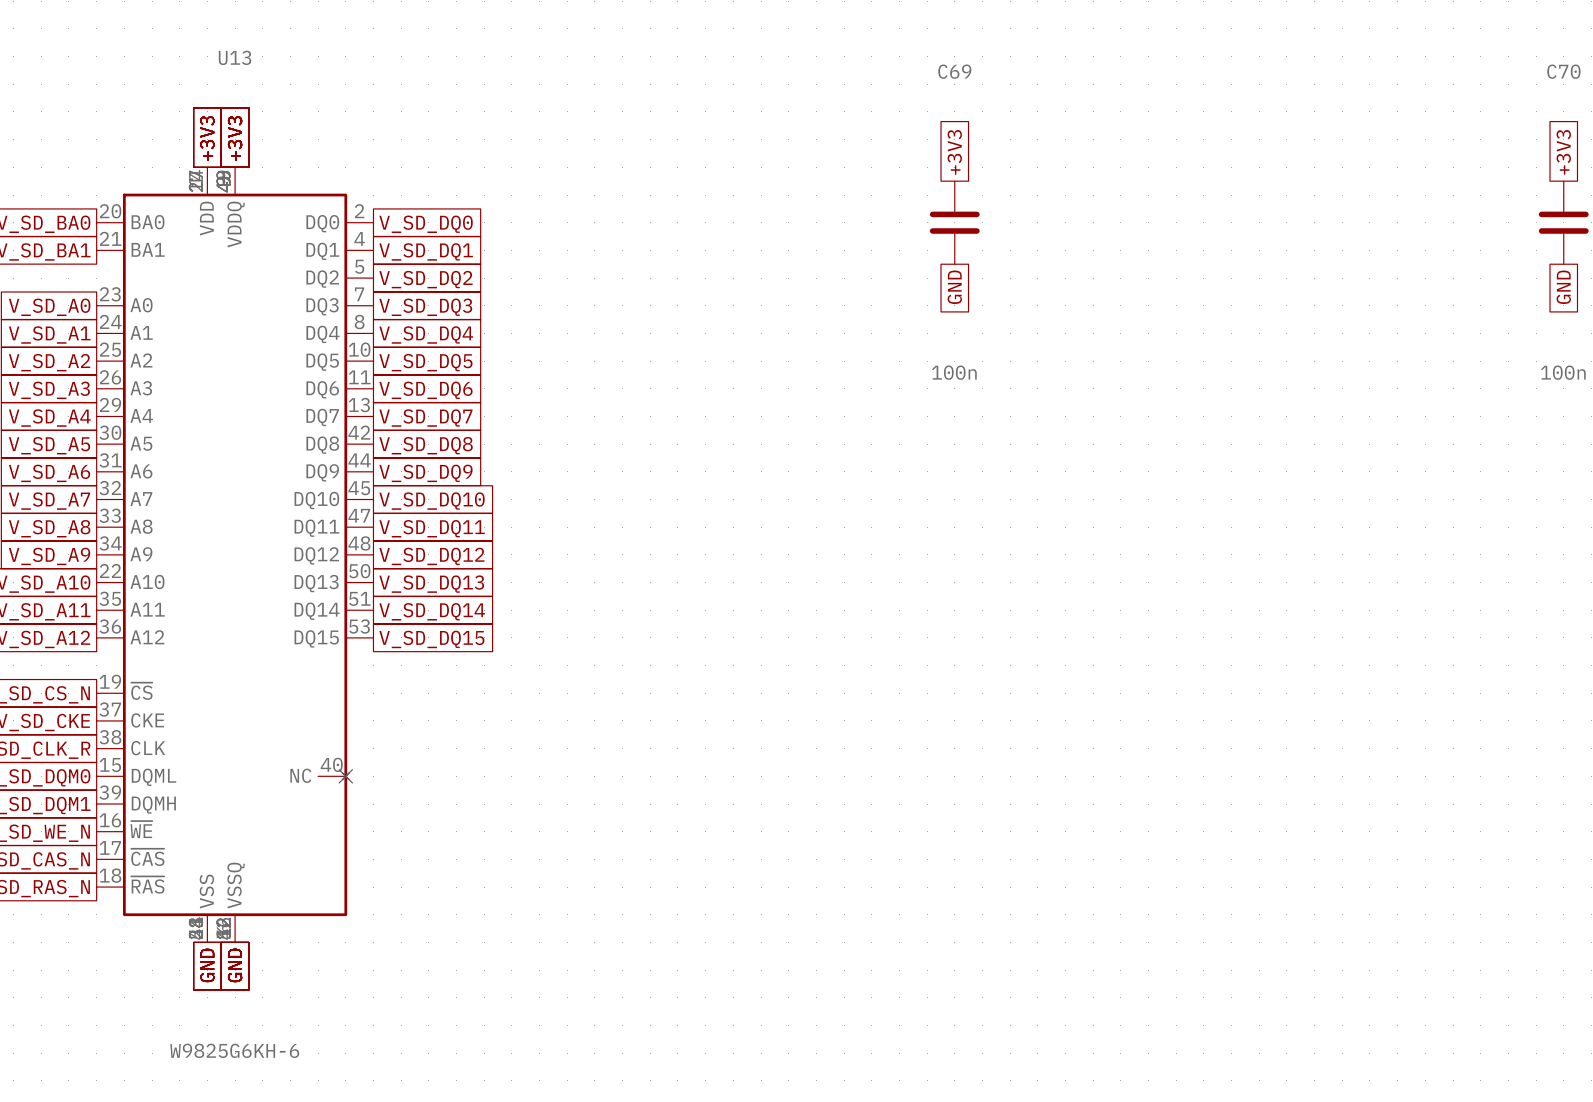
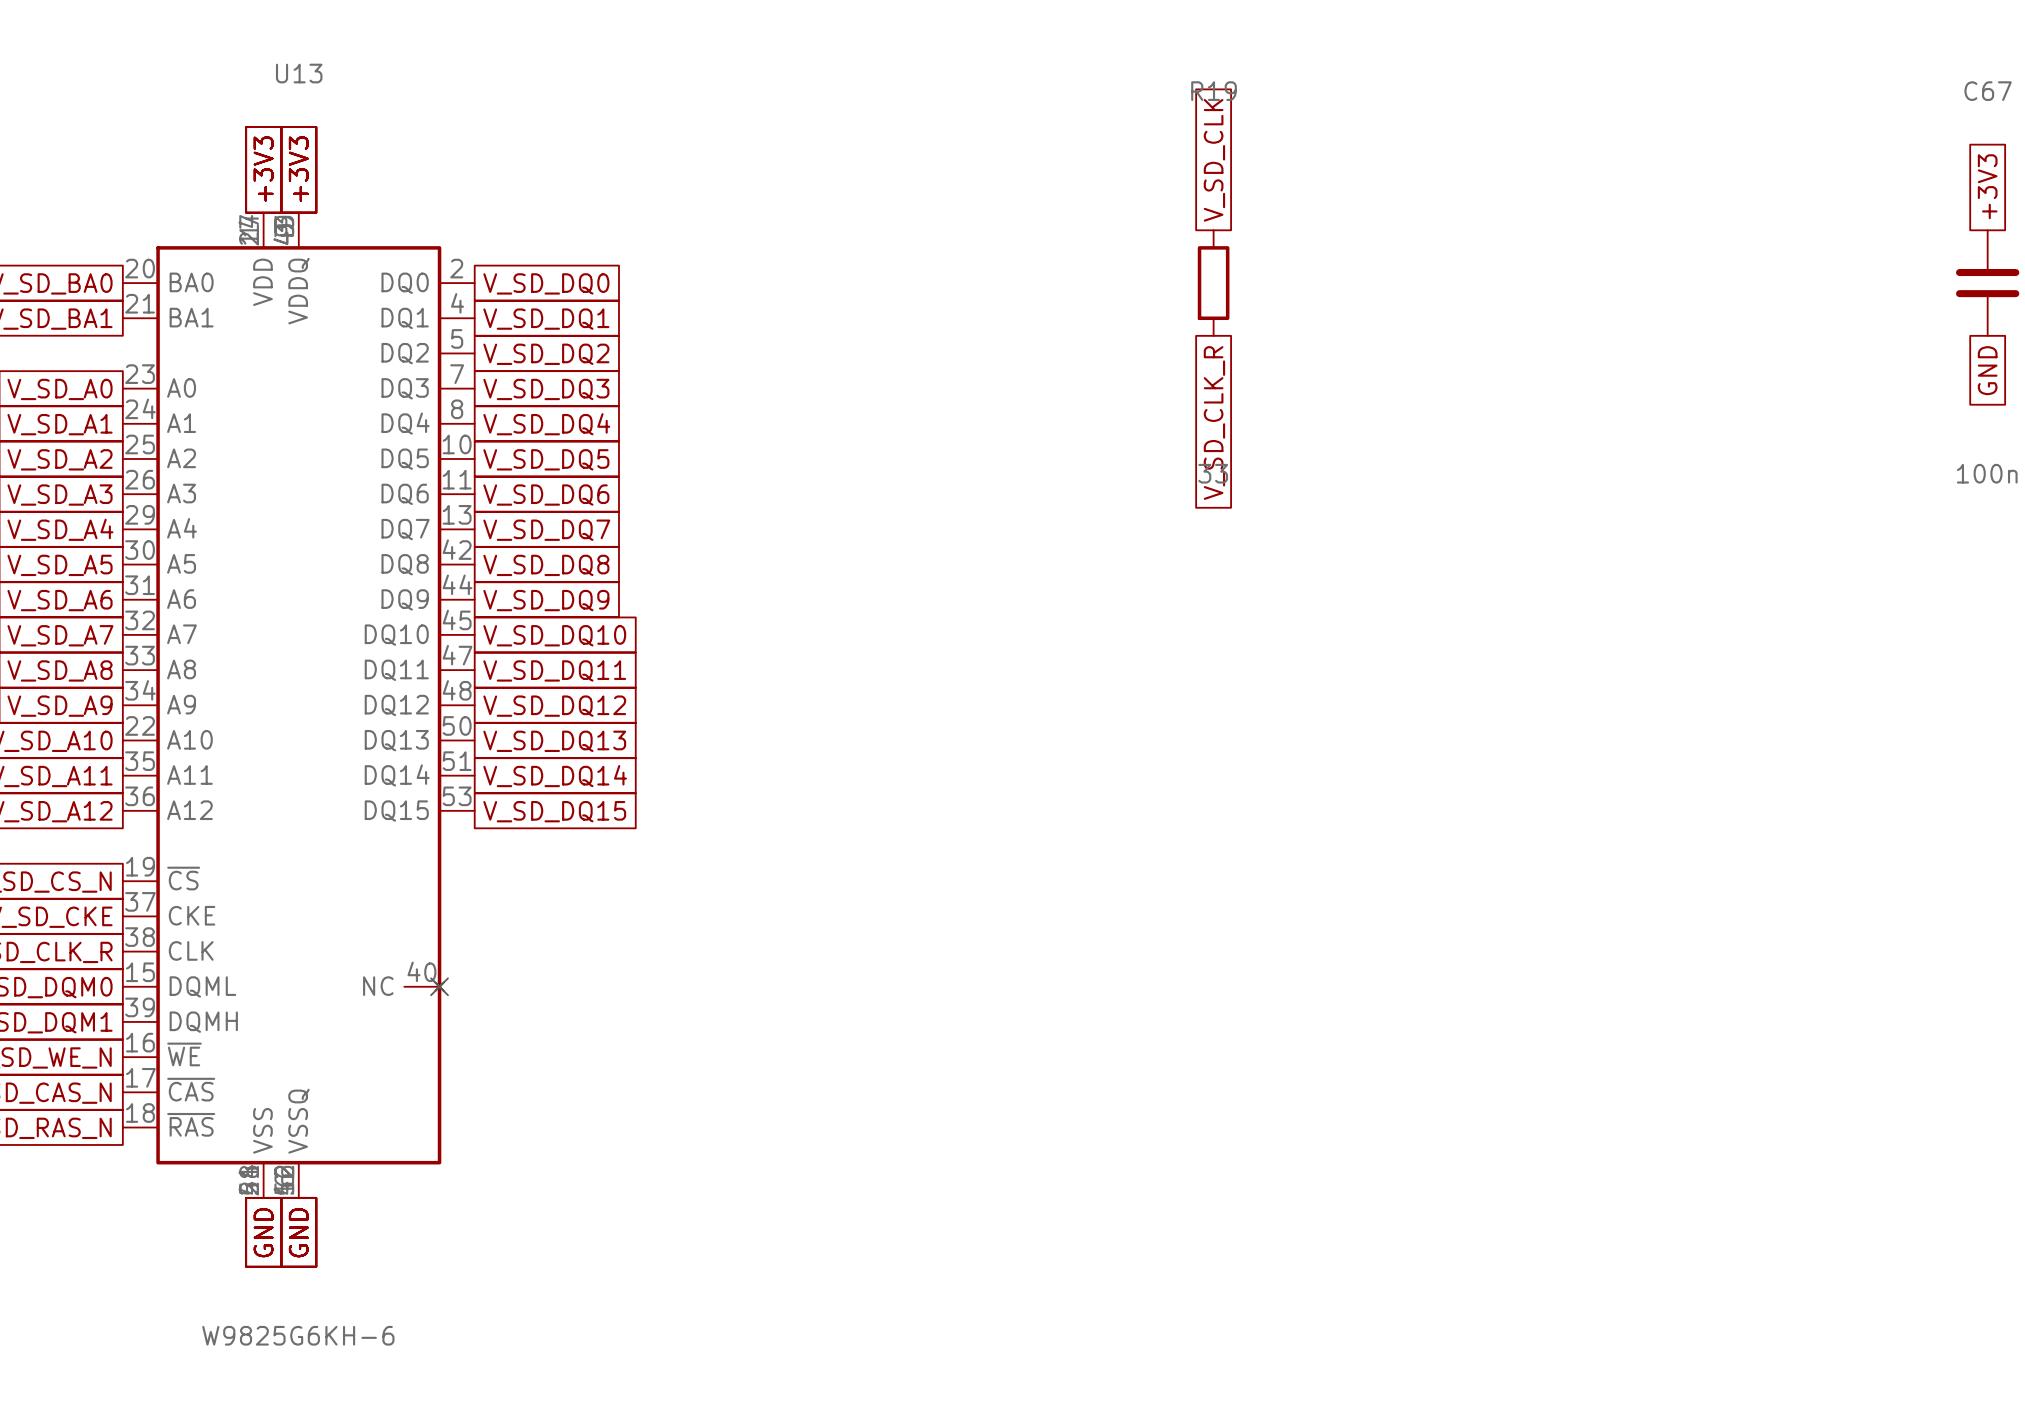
C70 name: C70 (1563, 71) -> C67 (1988, 91)
global label: +3V3 (954, 152) -> V_SD_CLK (1214, 160)
C69: 100n (954, 222) -> none
R19: none -> 33 (1213, 283)
global label: GND (954, 287) -> V_SD_CLK_R (1214, 423)

